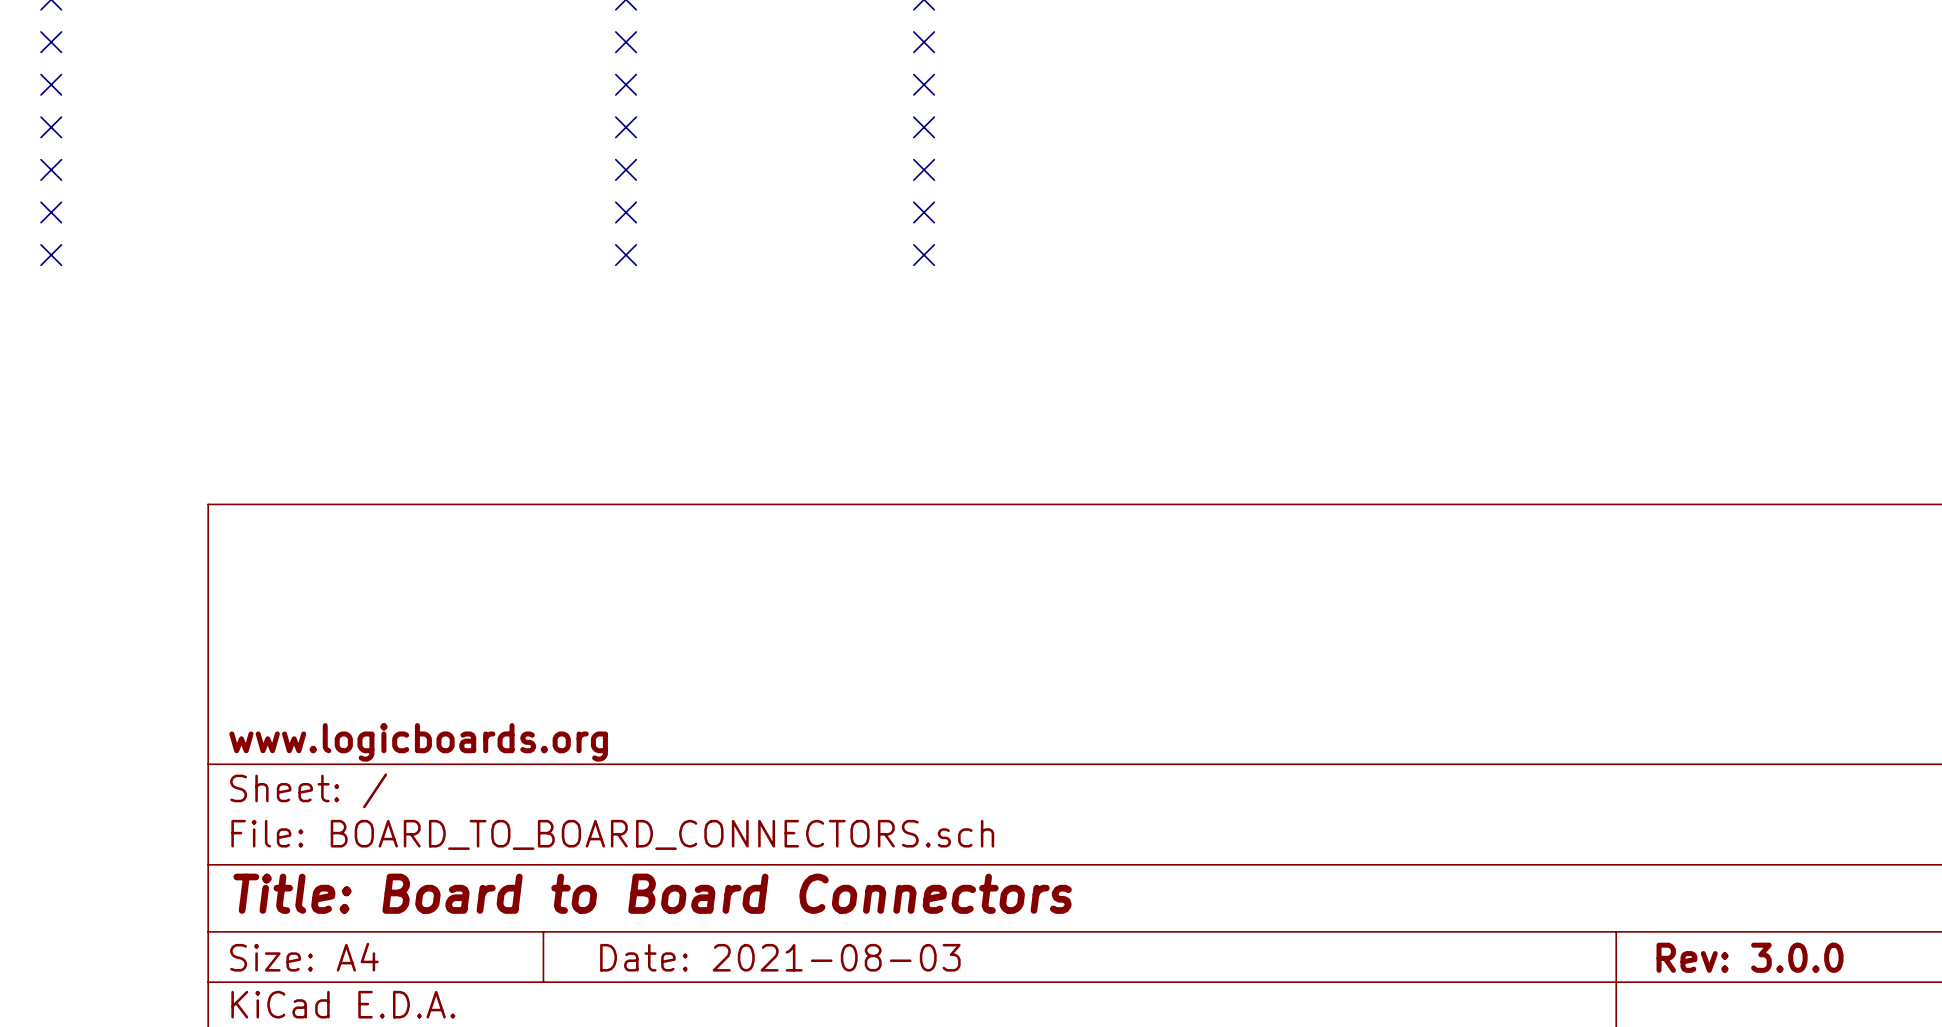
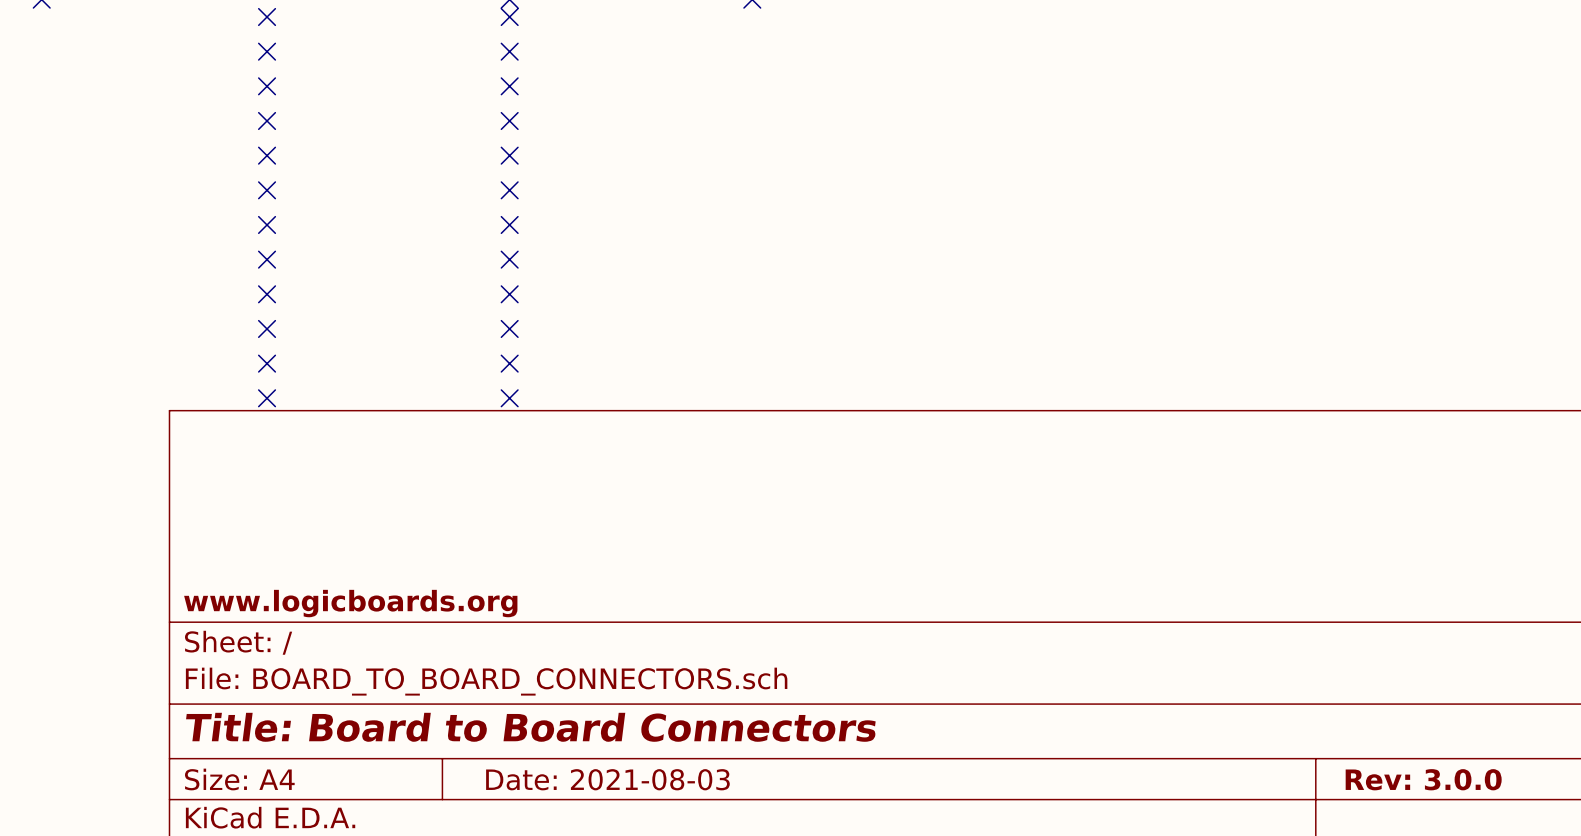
no-connect mark: none -> (267, 17)
no-connect mark: none -> (509, 17)
no-connect mark: (51, 42) -> none
no-connect mark: (626, 42) -> none
no-connect mark: (924, 42) -> none
no-connect mark: none -> (267, 51)
no-connect mark: none -> (509, 51)
no-connect mark: (51, 84) -> none
no-connect mark: (626, 84) -> none
no-connect mark: (924, 84) -> none
no-connect mark: none -> (267, 86)
no-connect mark: none -> (509, 86)
no-connect mark: (51, 127) -> none
no-connect mark: (626, 127) -> none
no-connect mark: (924, 127) -> none
no-connect mark: none -> (267, 120)
no-connect mark: none -> (509, 120)
no-connect mark: (51, 169) -> none
no-connect mark: (626, 169) -> none
no-connect mark: (924, 169) -> none
no-connect mark: none -> (267, 155)
no-connect mark: none -> (509, 155)
no-connect mark: (51, 212) -> none
no-connect mark: (626, 212) -> none
no-connect mark: (924, 212) -> none
no-connect mark: none -> (267, 190)
no-connect mark: none -> (509, 190)
no-connect mark: (51, 255) -> none
no-connect mark: (626, 255) -> none
no-connect mark: (924, 255) -> none
no-connect mark: none -> (267, 224)
no-connect mark: none -> (509, 224)
no-connect mark: none -> (267, 259)
no-connect mark: none -> (509, 259)
no-connect mark: none -> (267, 294)
no-connect mark: none -> (509, 294)
no-connect mark: none -> (267, 328)
no-connect mark: none -> (509, 328)
no-connect mark: none -> (267, 363)
no-connect mark: none -> (509, 363)
no-connect mark: none -> (267, 398)
no-connect mark: none -> (509, 398)

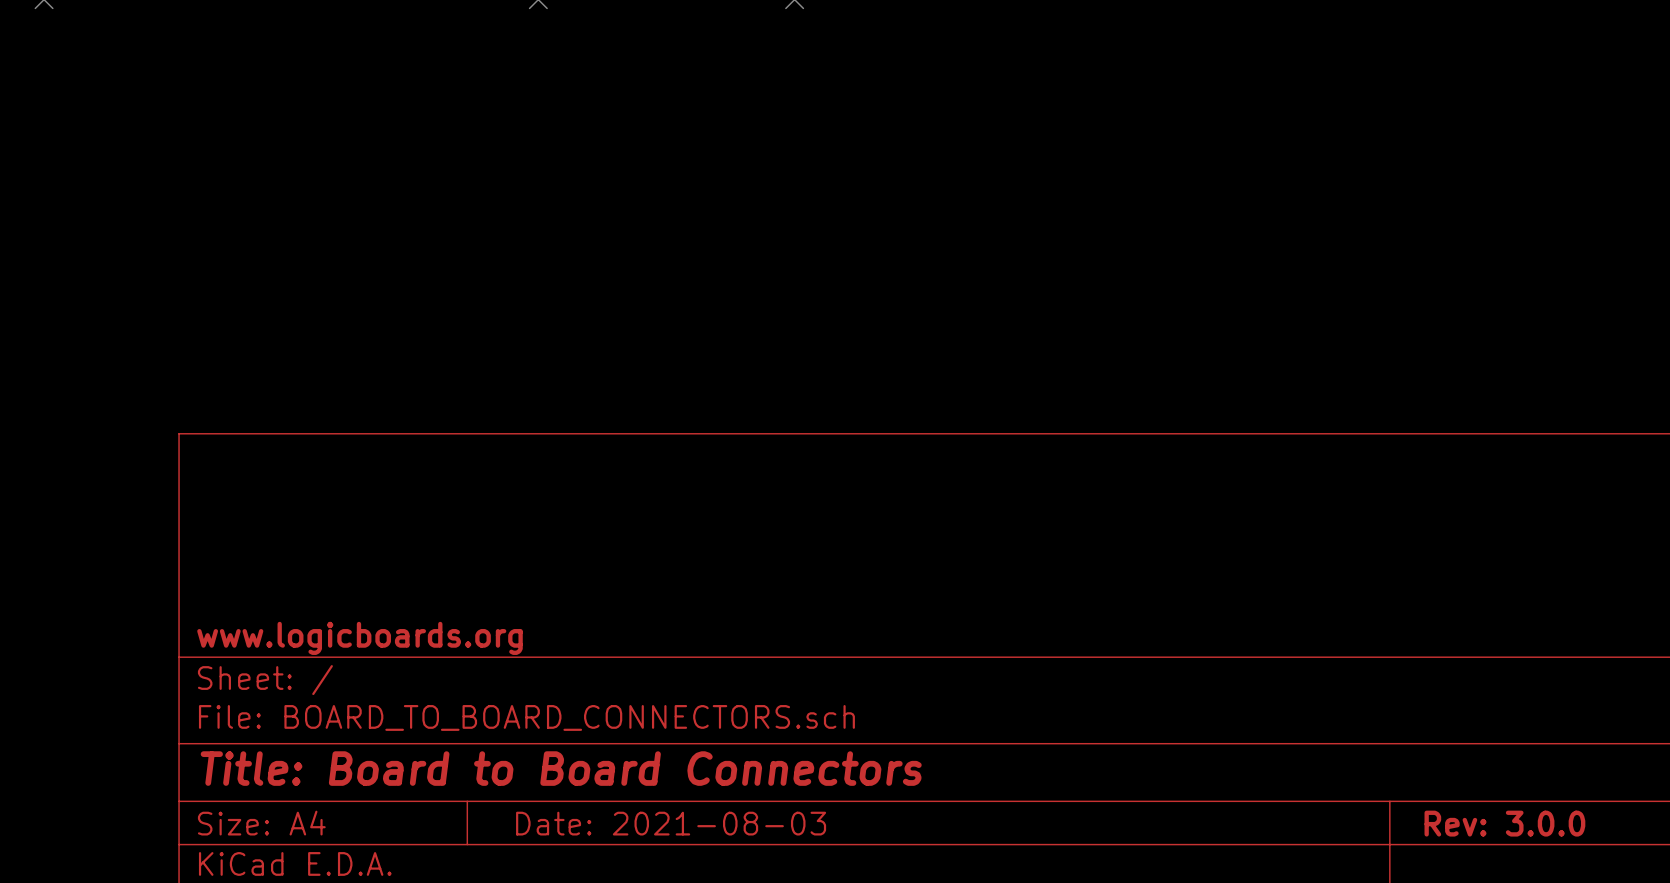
no-connect mark: (267, 17) -> none
no-connect mark: (509, 17) -> none
no-connect mark: (267, 51) -> none
no-connect mark: (509, 51) -> none
no-connect mark: (267, 86) -> none
no-connect mark: (509, 86) -> none
no-connect mark: (267, 120) -> none
no-connect mark: (509, 120) -> none
no-connect mark: (267, 155) -> none
no-connect mark: (509, 155) -> none
no-connect mark: (267, 190) -> none
no-connect mark: (509, 190) -> none
no-connect mark: (267, 224) -> none
no-connect mark: (509, 224) -> none
no-connect mark: (267, 259) -> none
no-connect mark: (509, 259) -> none
no-connect mark: (267, 294) -> none
no-connect mark: (509, 294) -> none
no-connect mark: (267, 328) -> none
no-connect mark: (509, 328) -> none
no-connect mark: (267, 363) -> none
no-connect mark: (509, 363) -> none
no-connect mark: (267, 398) -> none
no-connect mark: (509, 398) -> none

